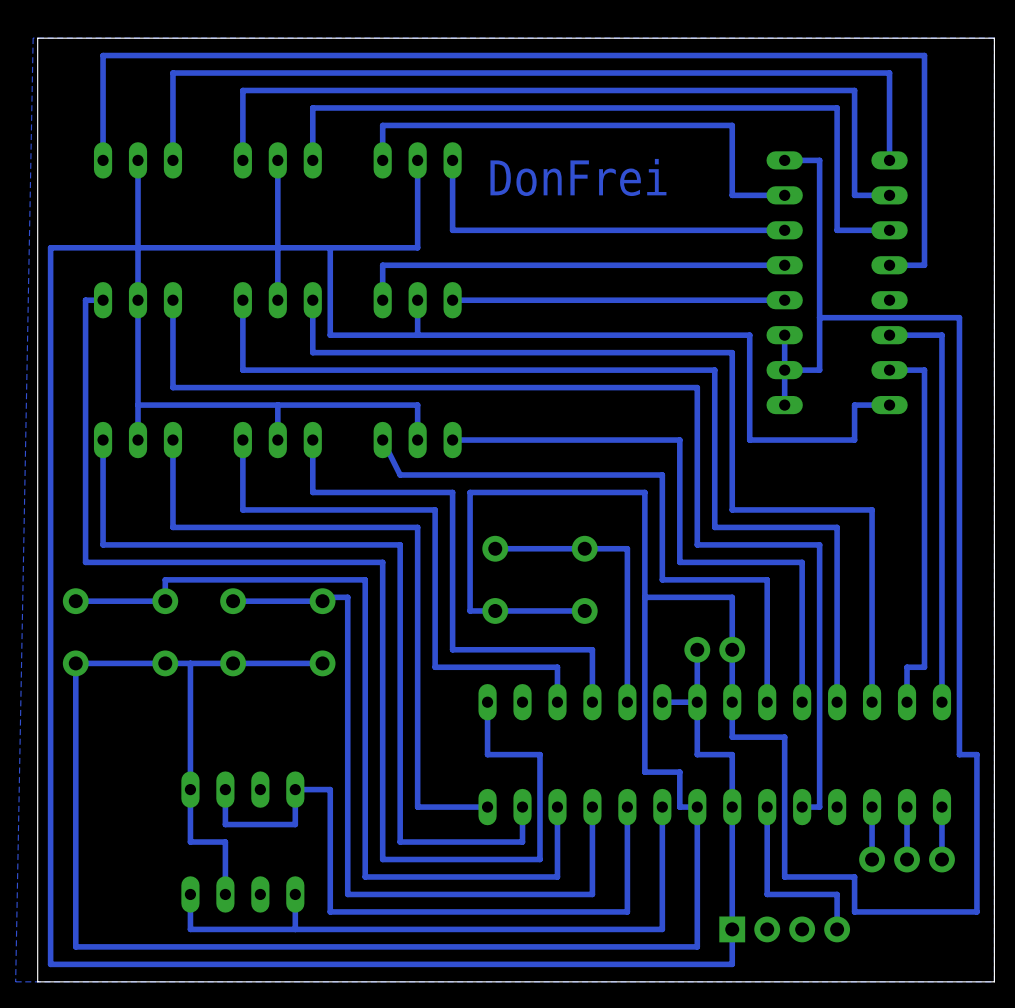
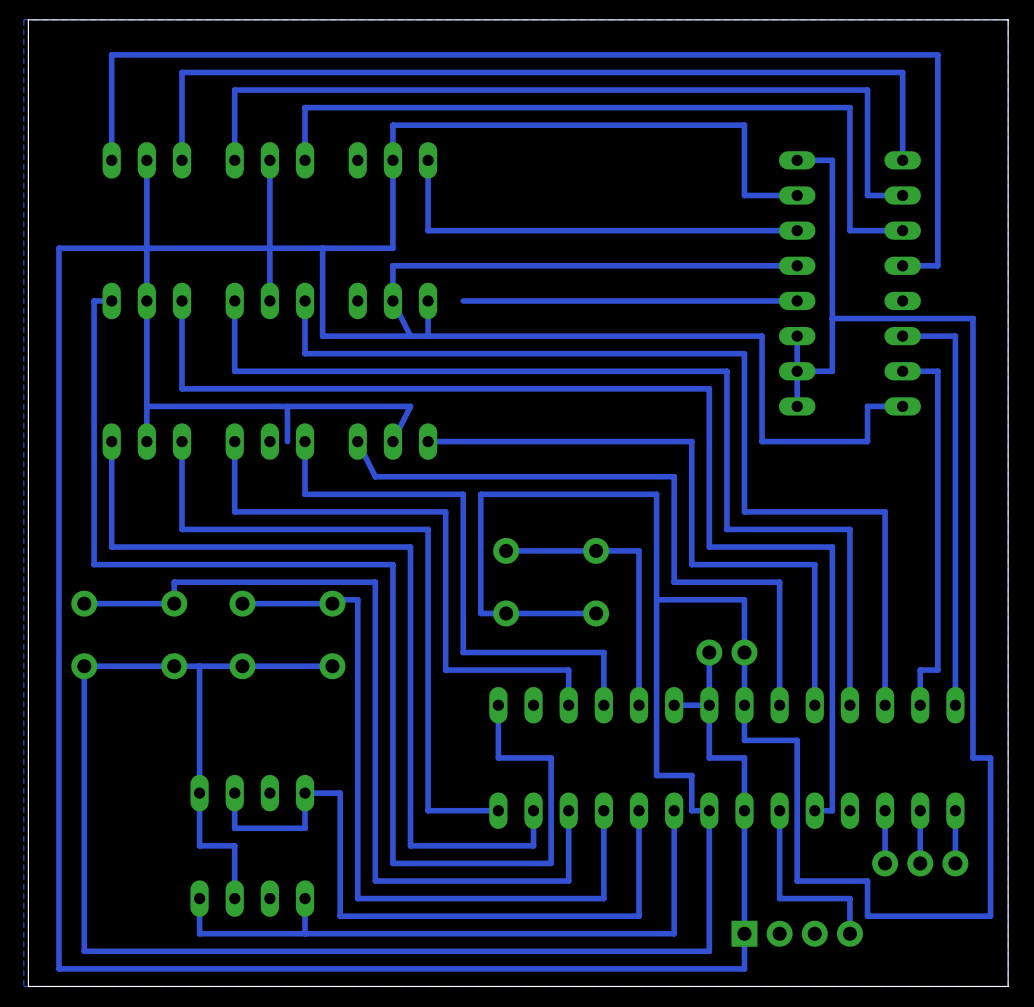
board edge: (994, 38) (37, 38) (37, 981) -> (1008, 37) (1008, 19) (28, 19) (28, 986) (45, 986)
bottom zone outline: (994, 38) (33, 38) (15, 981) -> (1008, 37) (1008, 19) (23, 19) (23, 986)
bottom track: (242, 90) (242, 160) -> (252, 90) (234, 90) (234, 160)
bottom track: (312, 107) (312, 160) -> (322, 107) (305, 107) (305, 160)
bottom track: (277, 160) (277, 300) -> (269, 160) (269, 300)
part position: (277, 160) -> (269, 160)
part position: (417, 160) -> (392, 160)
bottom track: (452, 160) (452, 230) -> none
text: DonFrei (578, 177) -> none
bottom track: (417, 230) (417, 247) (382, 247) -> (428, 230) (463, 230)
bottom track: none -> (322, 248) (322, 300)
bottom track: (330, 247) (330, 335) -> (392, 160) (392, 248)
bottom track: (242, 300) (242, 370) -> (234, 300) (234, 371) (252, 371)
part position: (277, 300) -> (269, 300)
bottom track: none -> (305, 300) (305, 353) (322, 353)
bottom track: none -> (392, 300) (410, 336)
part position: (417, 300) -> (392, 300)
bottom track: (312, 335) (312, 352) -> (322, 336) (340, 336)
bottom track: (400, 405) (417, 405) (417, 440) -> (410, 406) (392, 441)
bottom track: (242, 440) (242, 509) -> (234, 441) (234, 511) (252, 511)
part position: (277, 440) -> (269, 441)
bottom track: (312, 440) (312, 492) -> (305, 441) (305, 494) (322, 494)
bottom track: (382, 440) (400, 474) -> (357, 441) (375, 476) (410, 476)
part position: (417, 440) -> (392, 441)
bottom track: none -> (463, 441) (428, 441)

